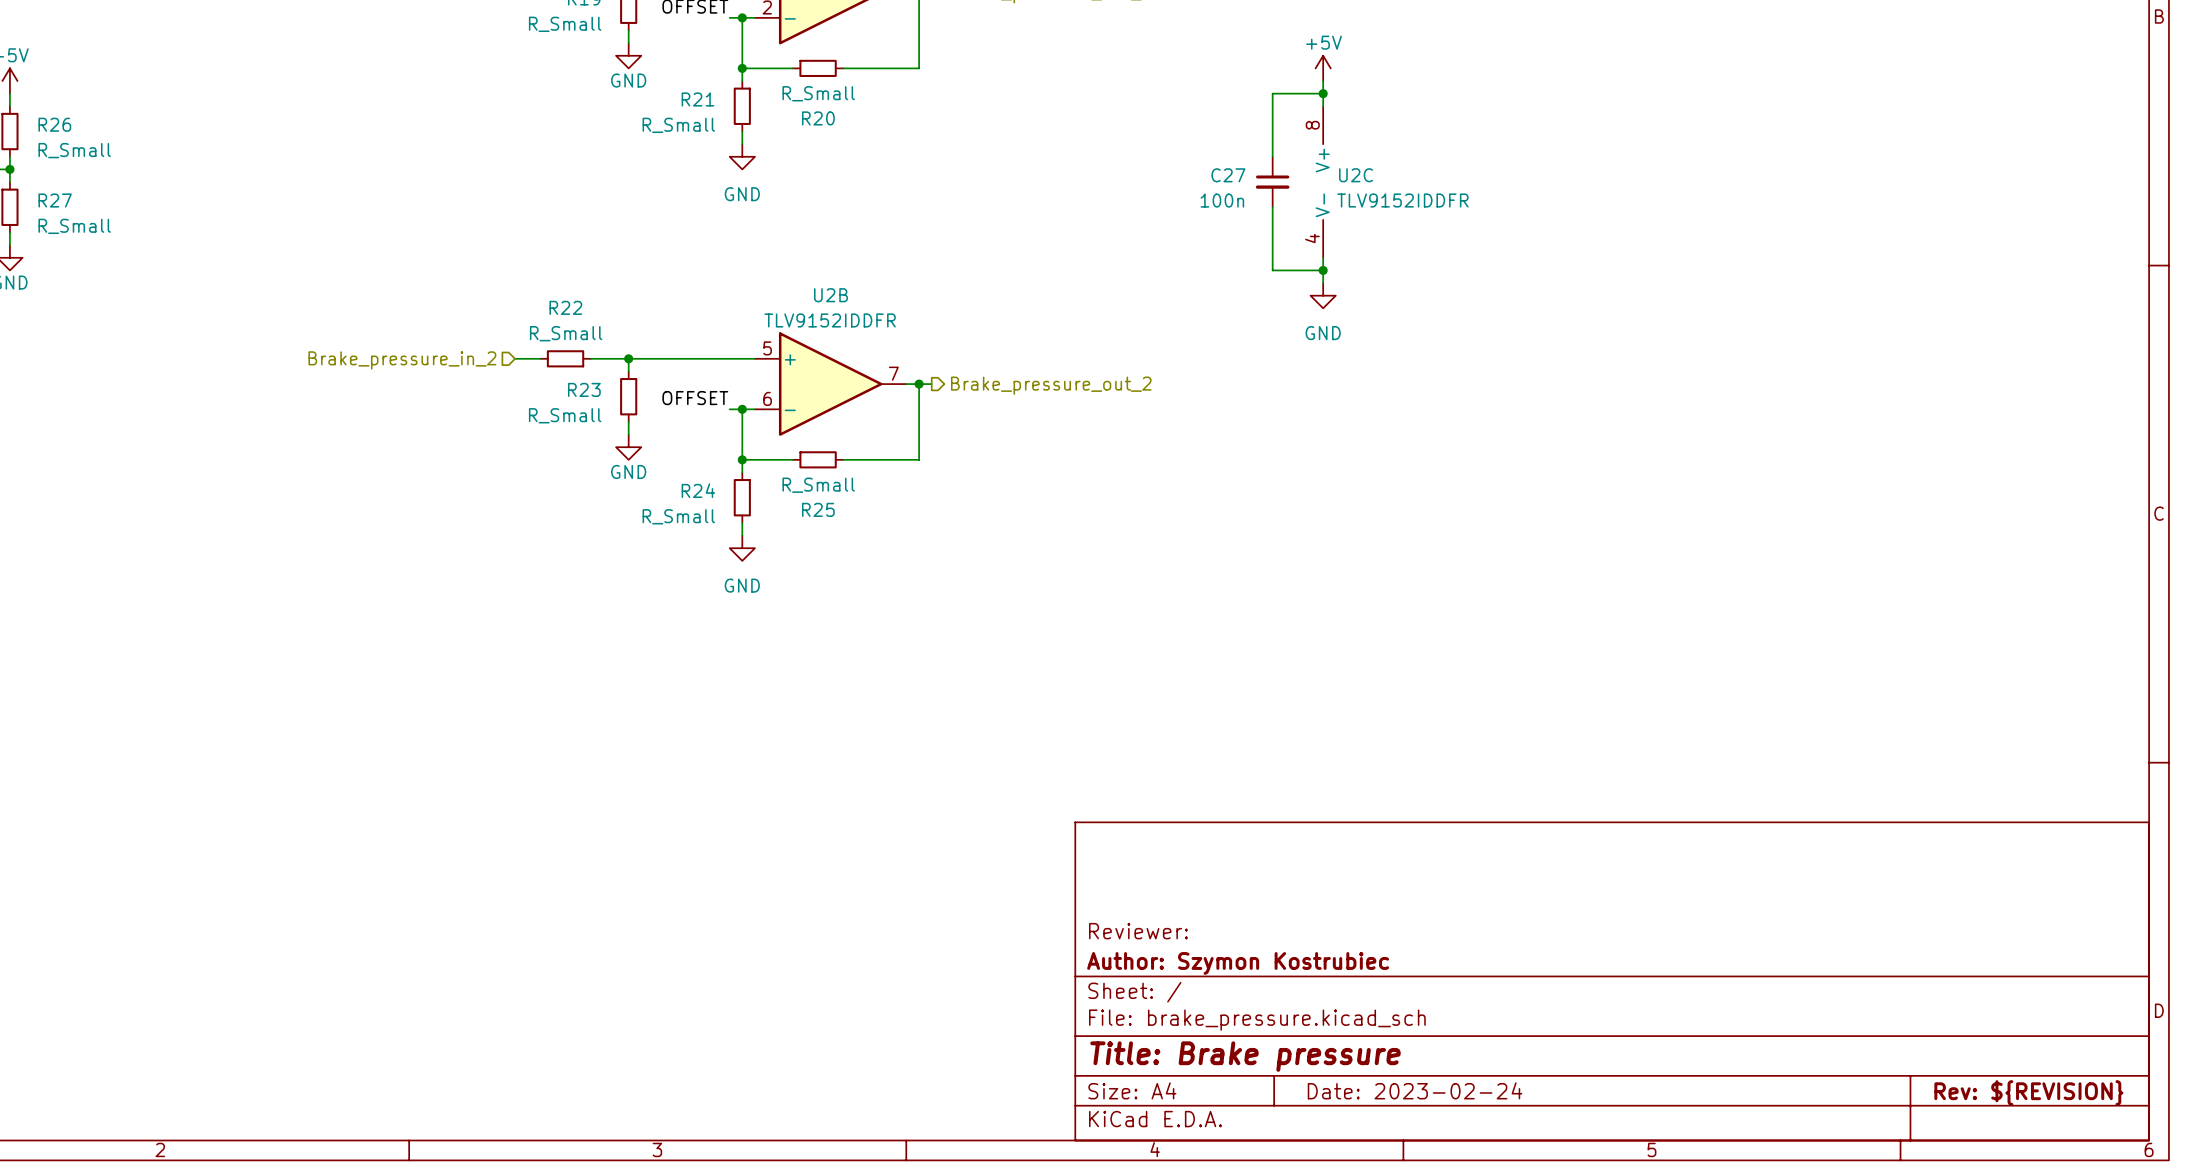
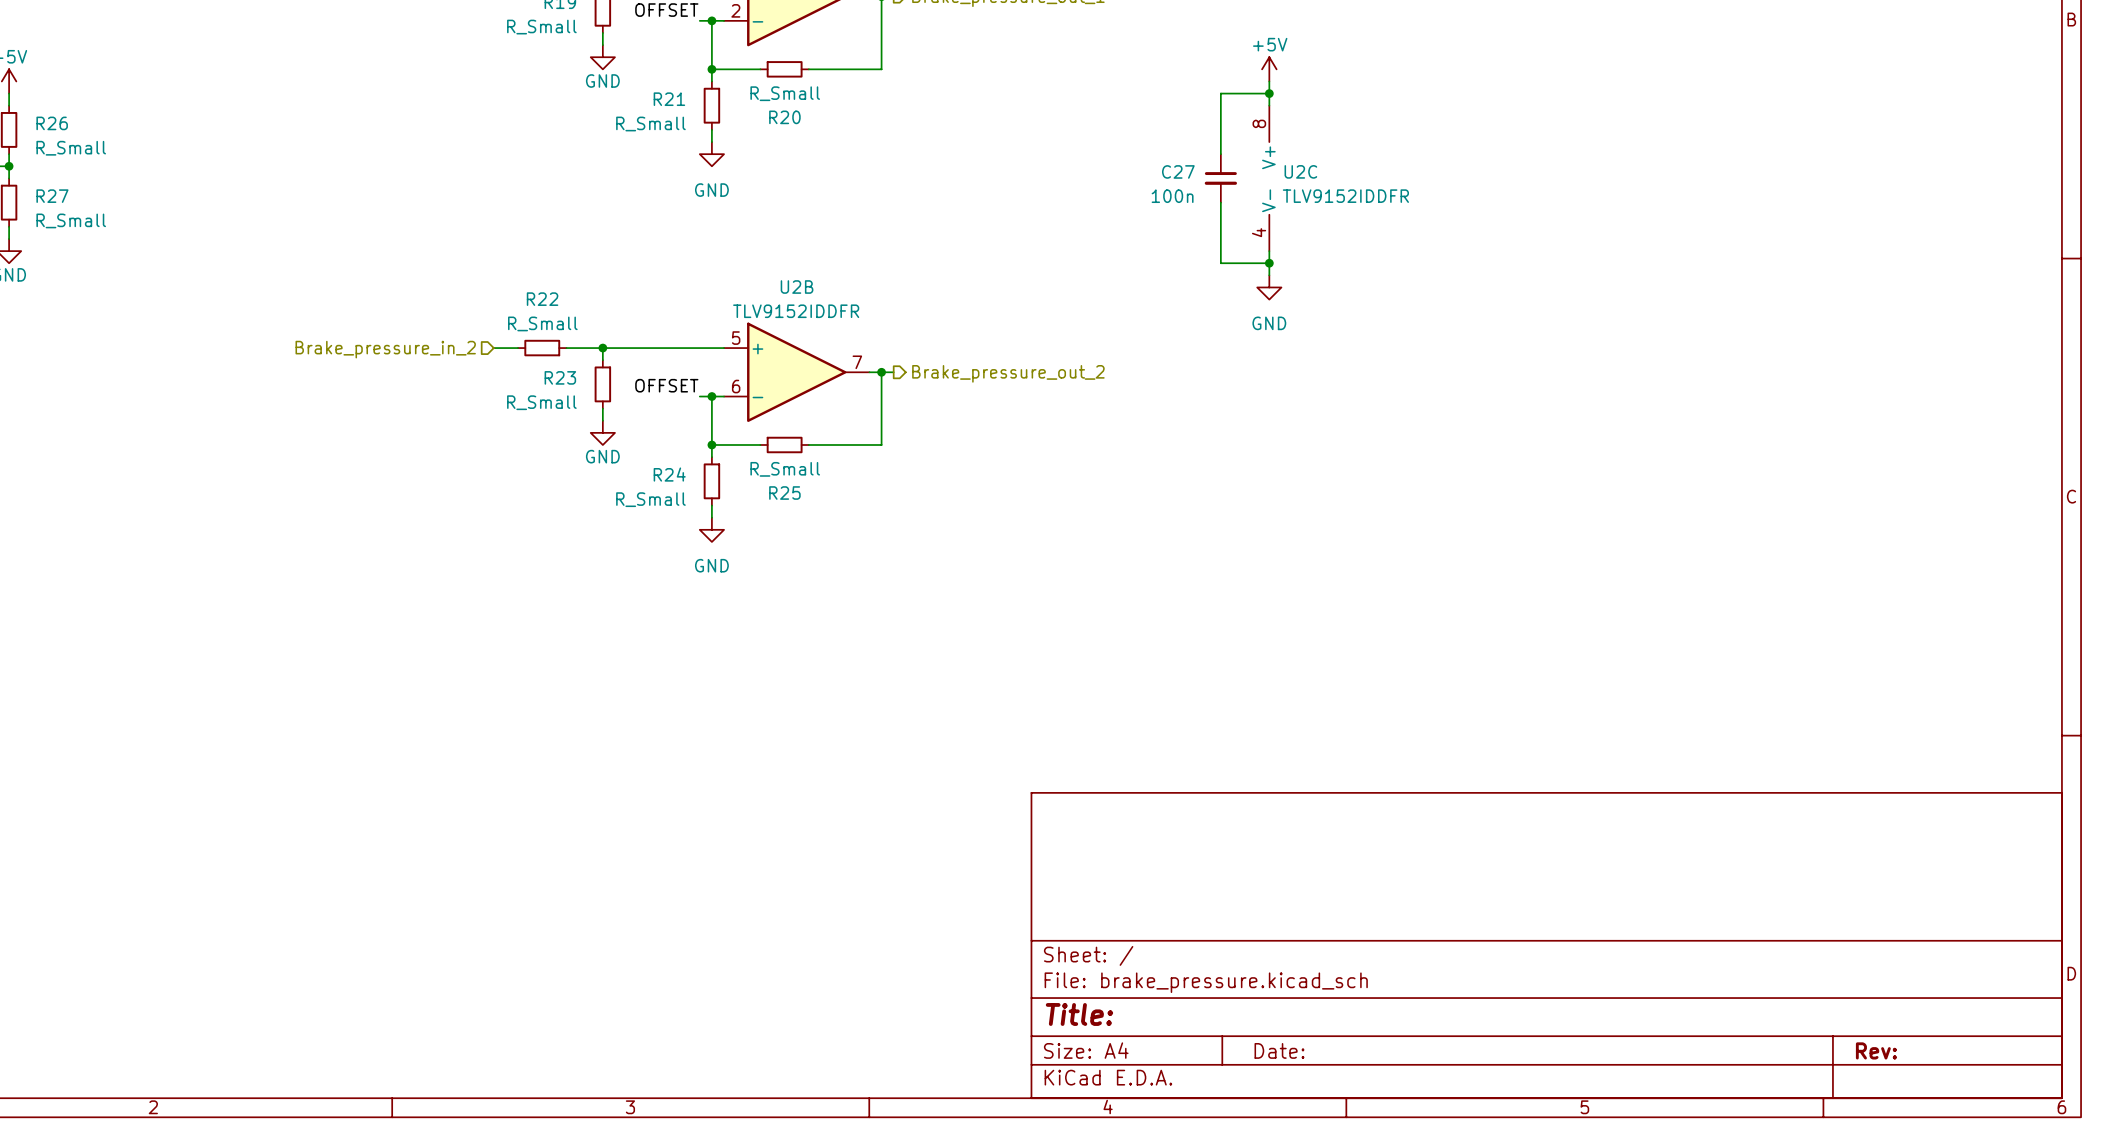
title block: Reviewer: (1138, 931) -> none
title block: Author: Szymon Kostrubiec (1238, 963) -> none
title block: Title: Brake pressure (1245, 1056) -> Title: (1079, 1014)
title block: Date: 2023-02-24 (1415, 1090) -> Date: (1279, 1050)
title block: Rev: ${REVISION} (2028, 1093) -> Rev: (1876, 1050)

